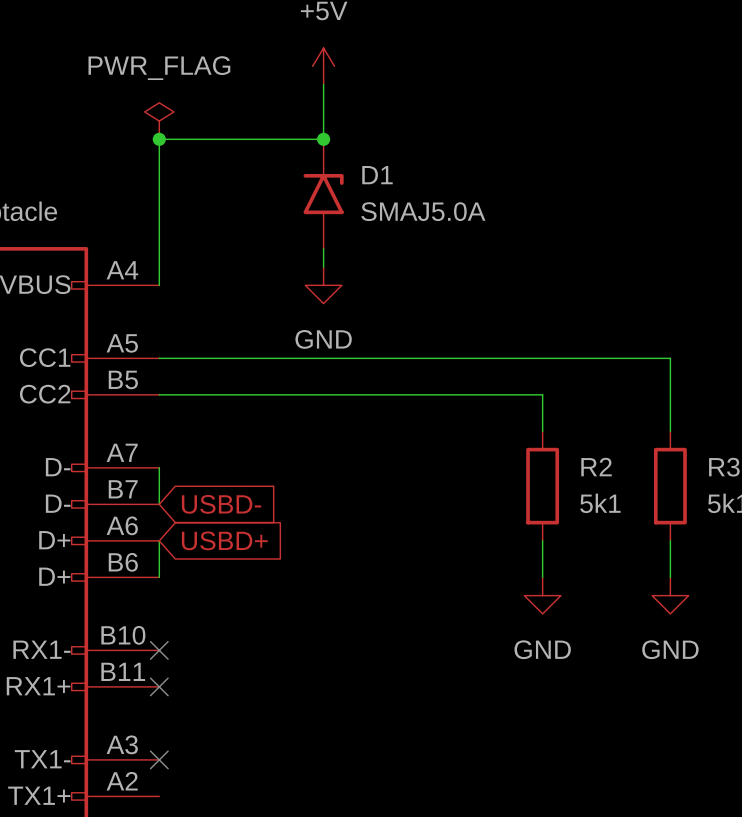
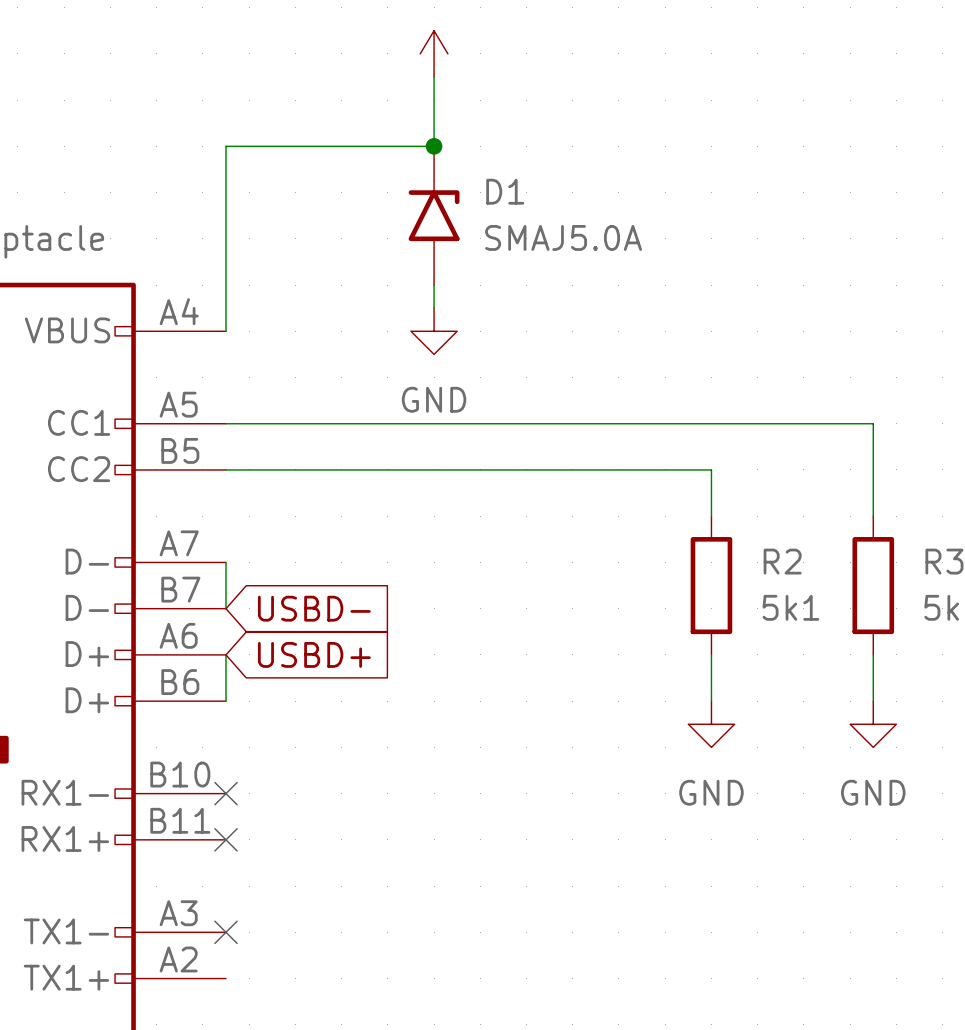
power symbol: PWR_FLAG (159, 121) -> none
junction: (159, 139) -> none

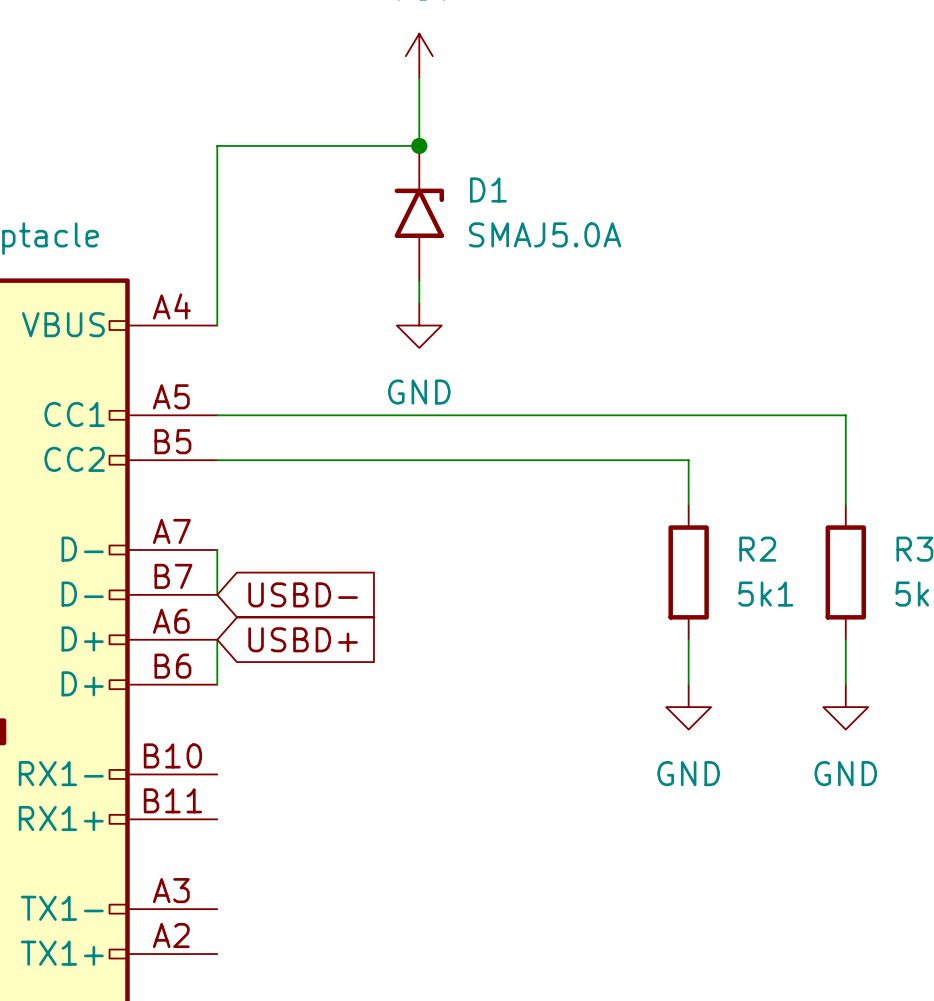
no-connect mark: (226, 793) -> none
no-connect mark: (226, 839) -> none
no-connect mark: (226, 932) -> none

